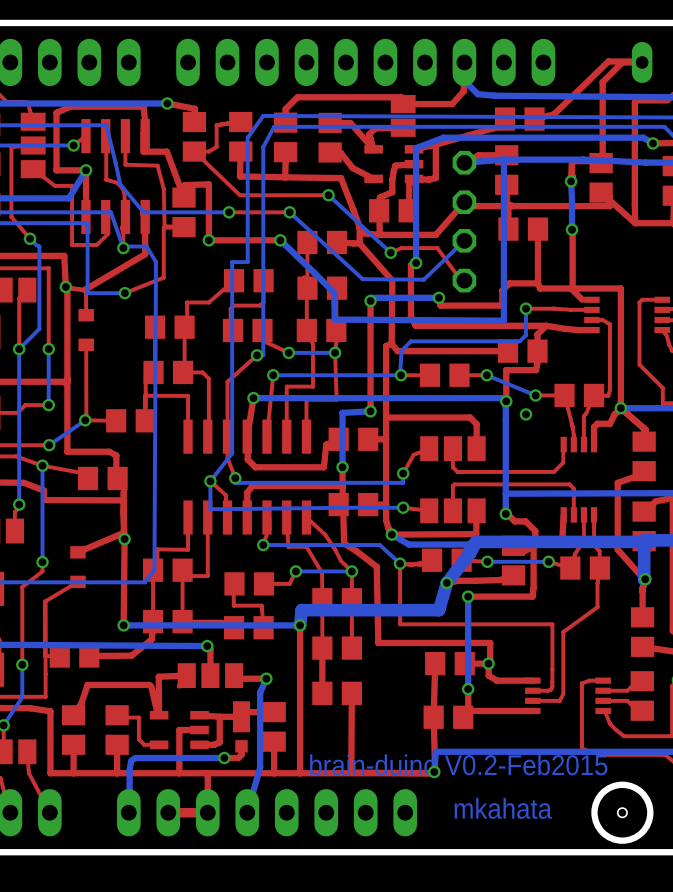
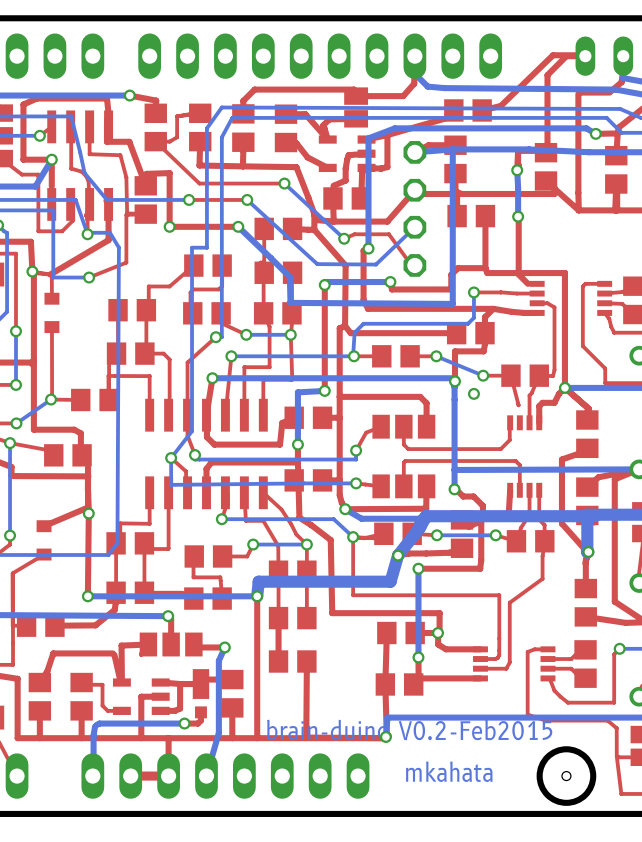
top track: (572, 426) (573, 444) -> none

